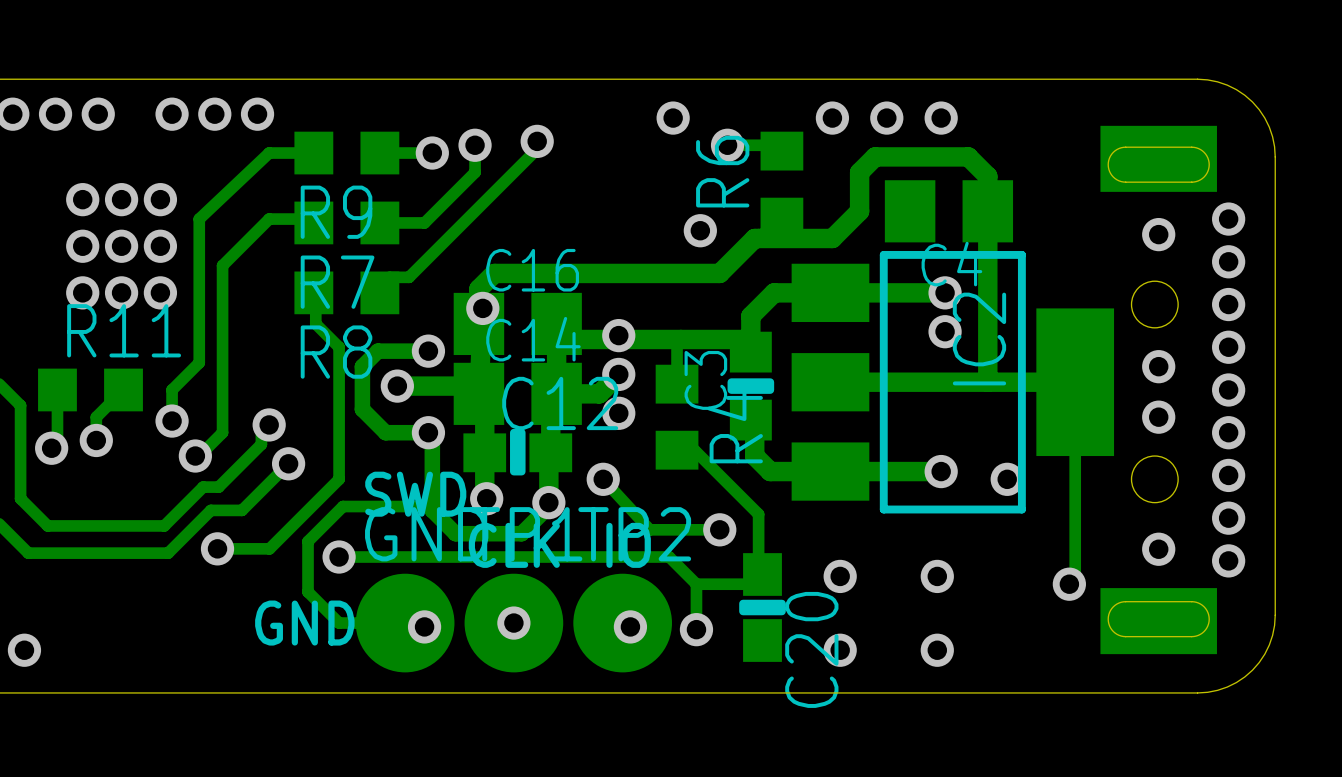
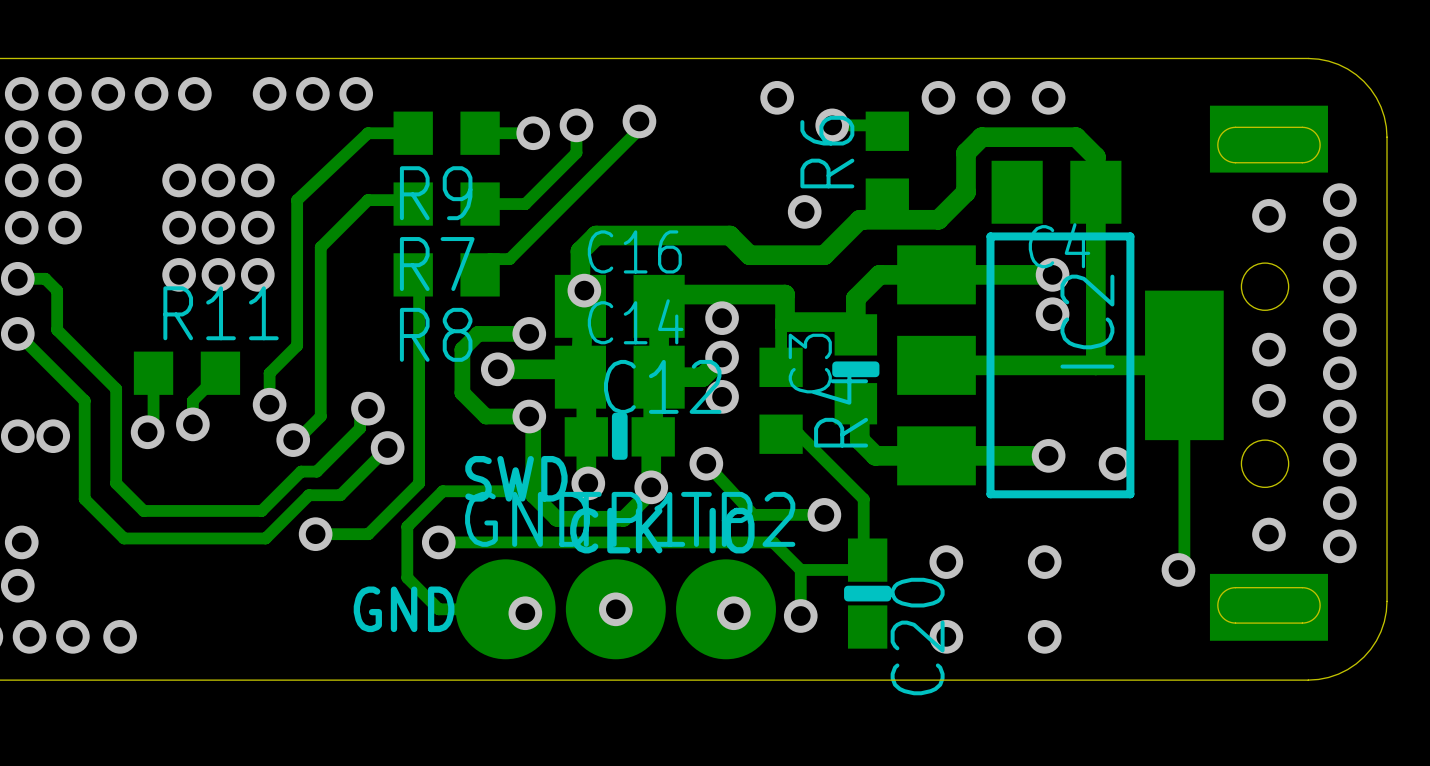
track: (645, 273) (494, 273) (478, 288) -> (749, 255) (729, 235) (596, 235) (580, 251) (580, 270)
track: (315, 304) (315, 323) (339, 347) (339, 479) (319, 498) -> (415, 286) (419, 290) (419, 483)
track: (556, 323) (572, 339) (680, 339) -> (659, 306) (659, 294) (785, 294) (785, 322)

